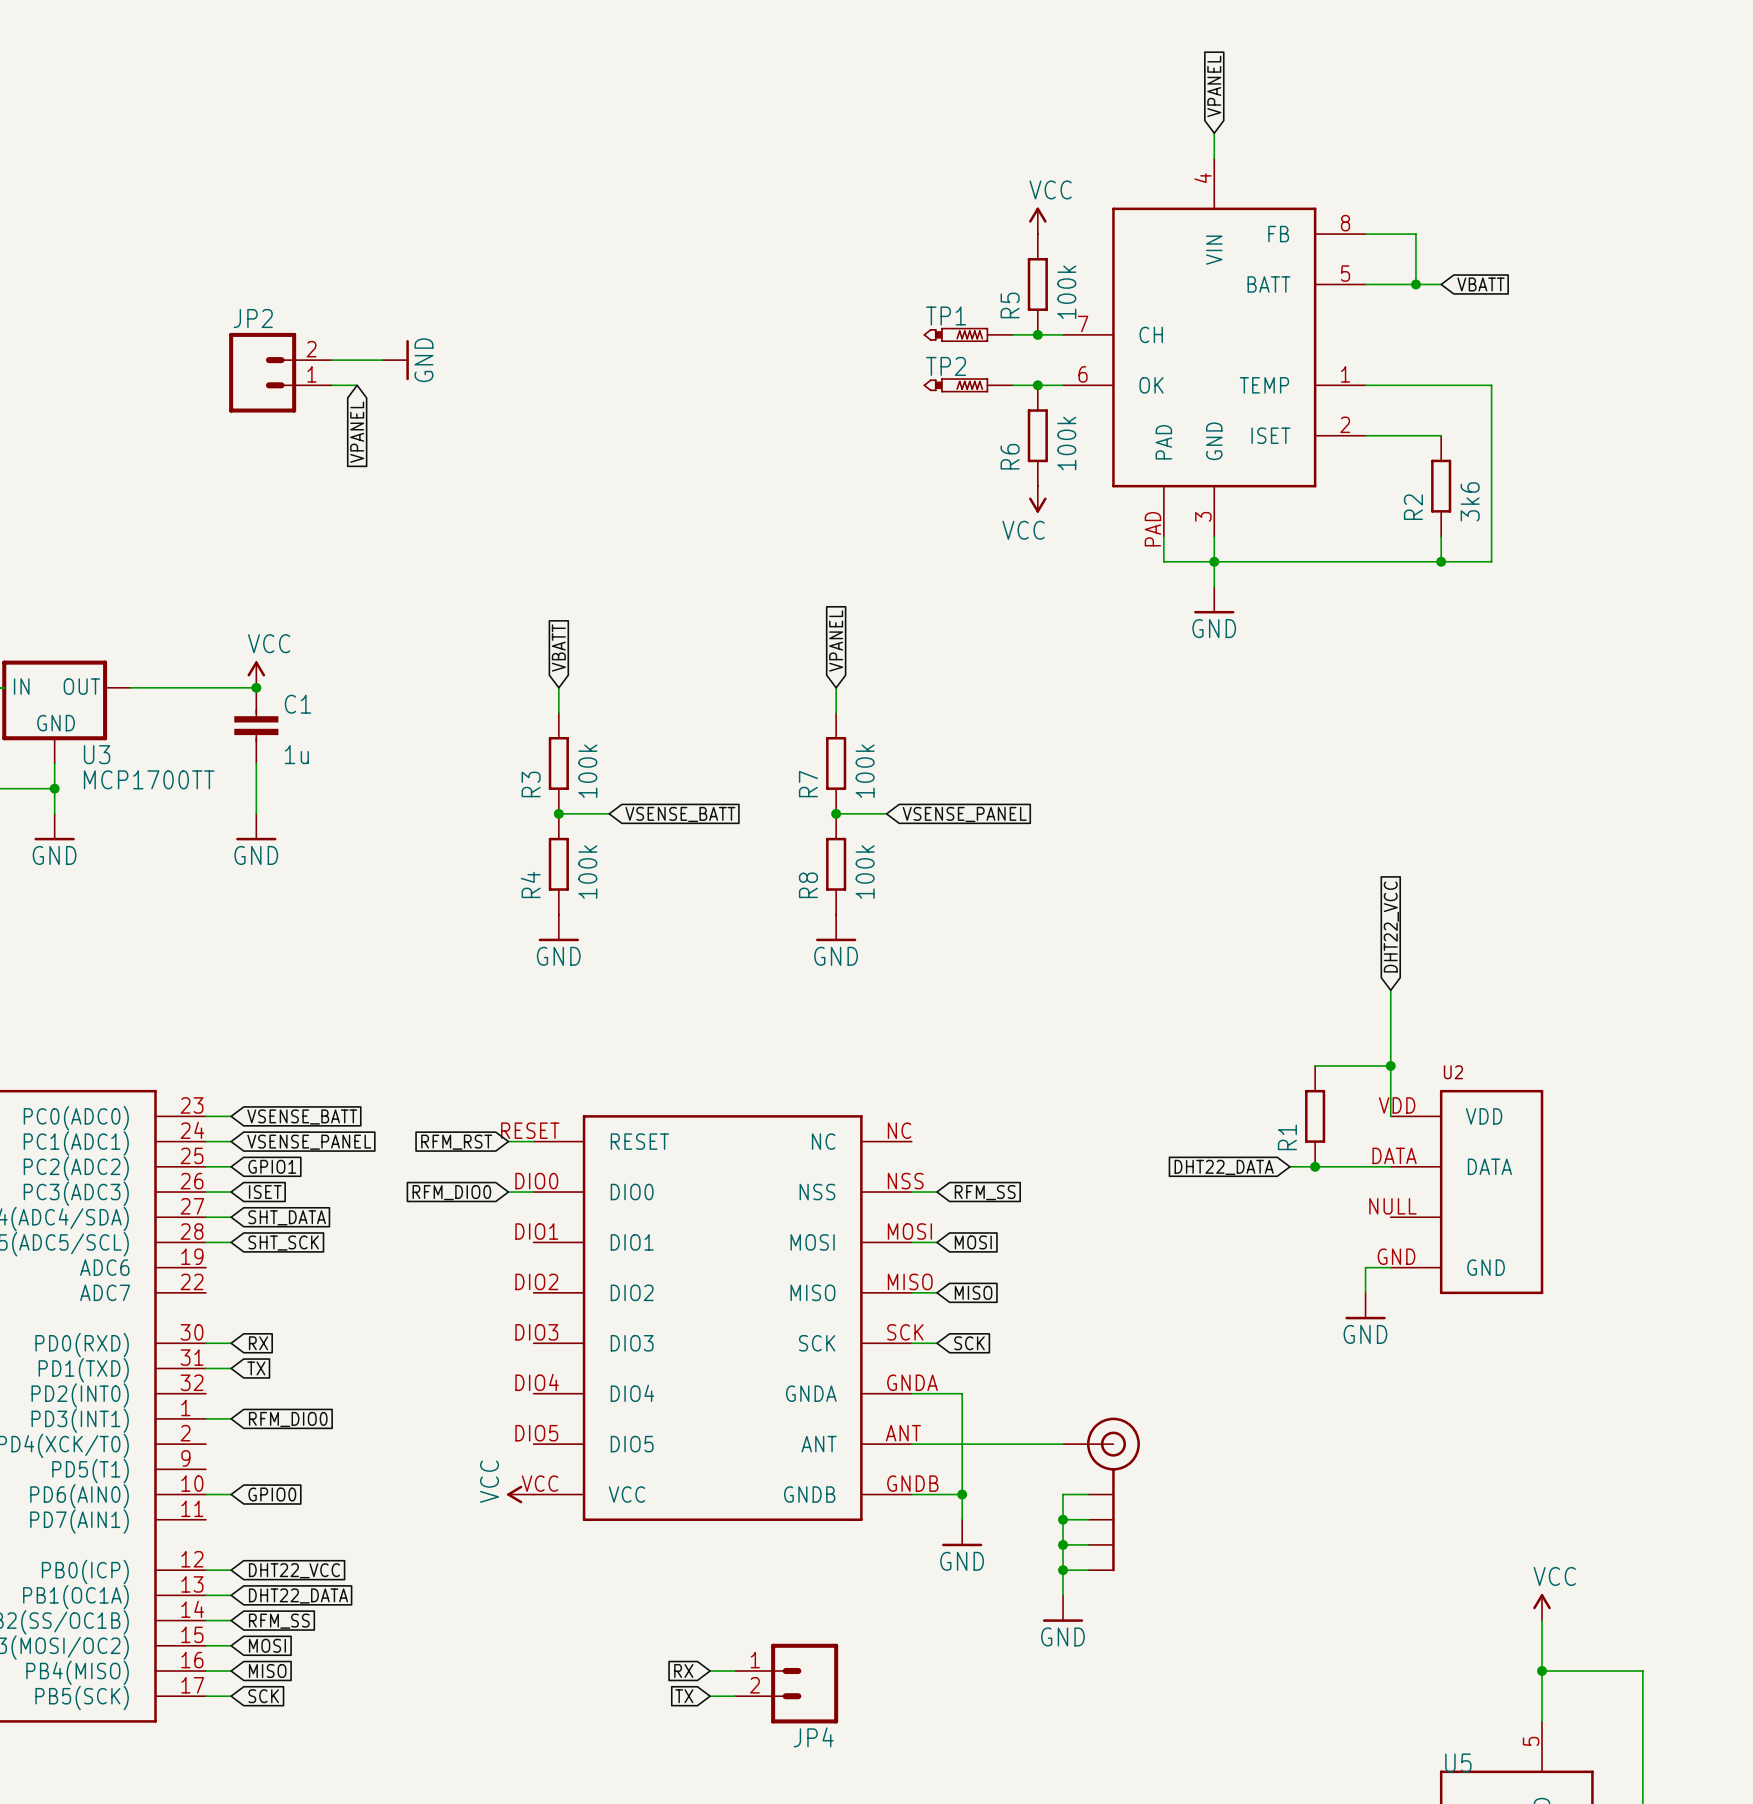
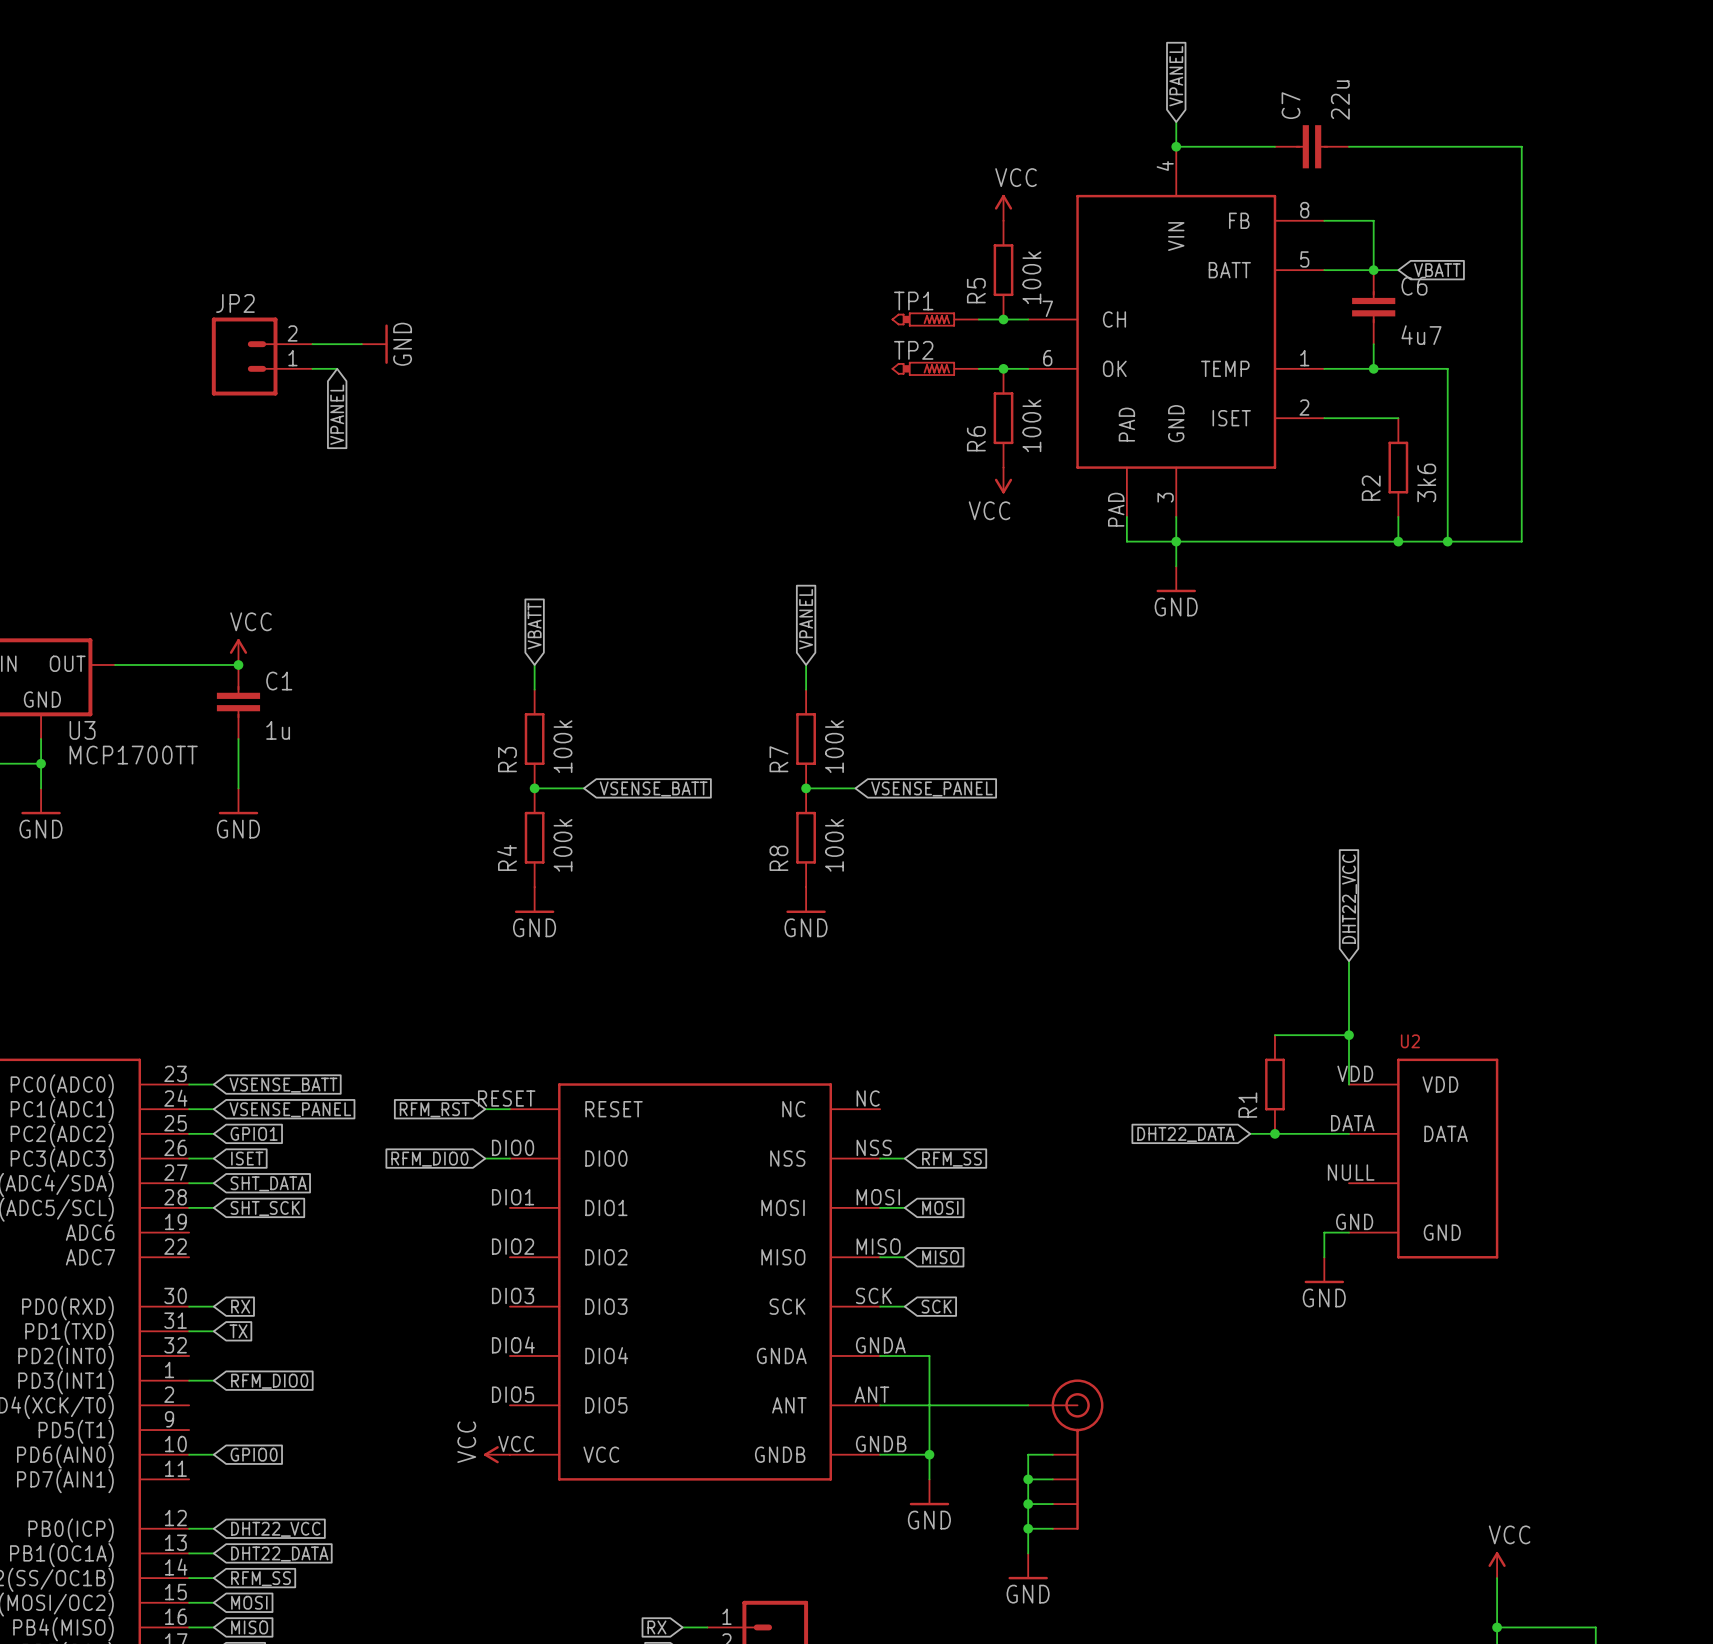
wire: none -> (1176, 146) (1274, 146)
junction: none -> (1176, 146)
C7: none -> 22u (1311, 146)
wire: none -> (1349, 146) (1521, 146) (1521, 541) (1447, 541)
C6: none -> 4u7 (1373, 307)
wire: none -> (1373, 344) (1373, 368)
junction: none -> (1373, 368)
junction: none -> (1447, 541)

